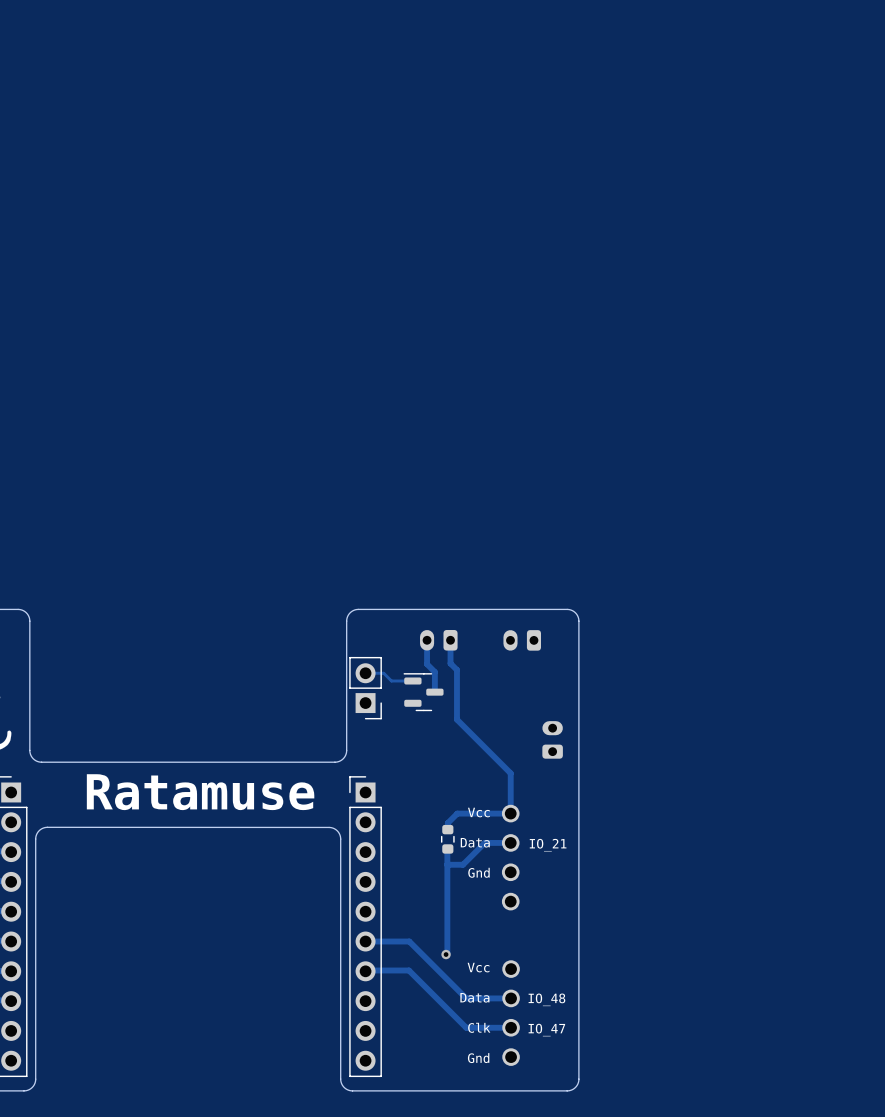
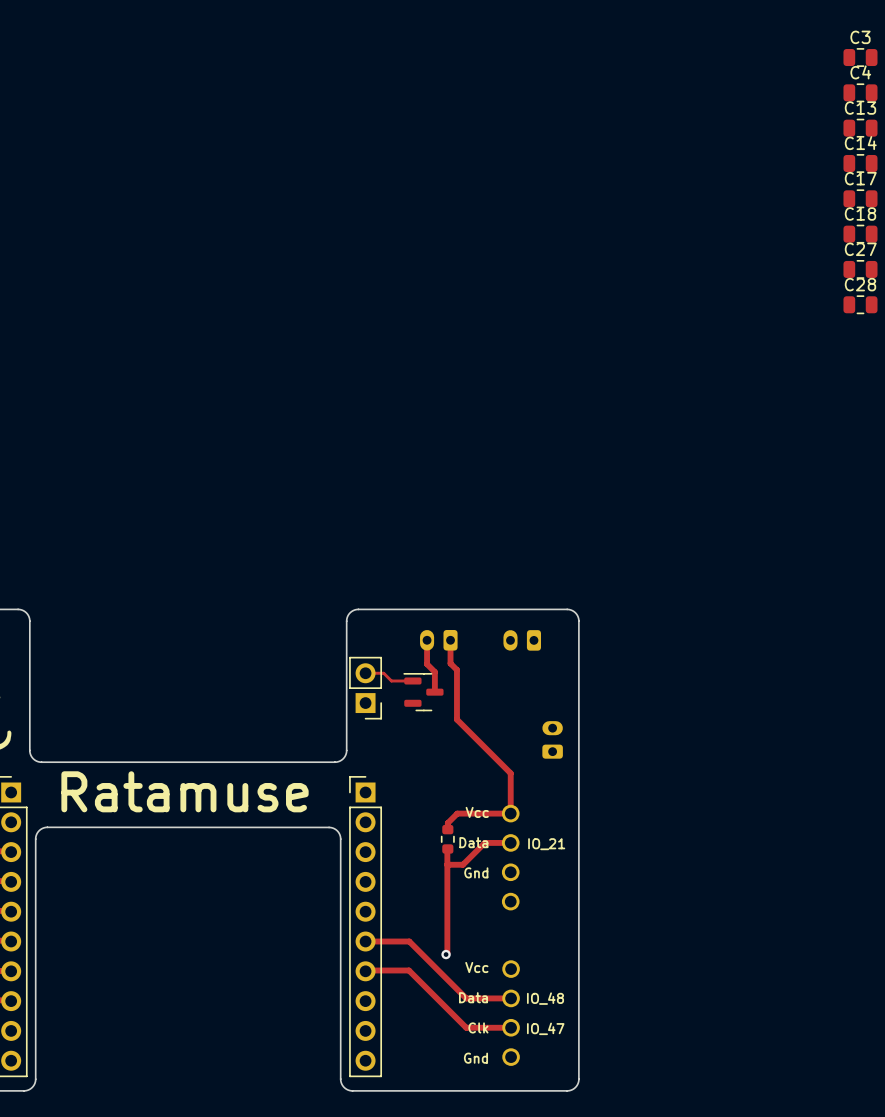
C3: none -> (860, 57)
C4: none -> (860, 92)
C13: none -> (860, 128)
C14: none -> (860, 163)
C17: none -> (860, 198)
C18: none -> (860, 234)
C27: none -> (860, 269)
C28: none -> (860, 304)

